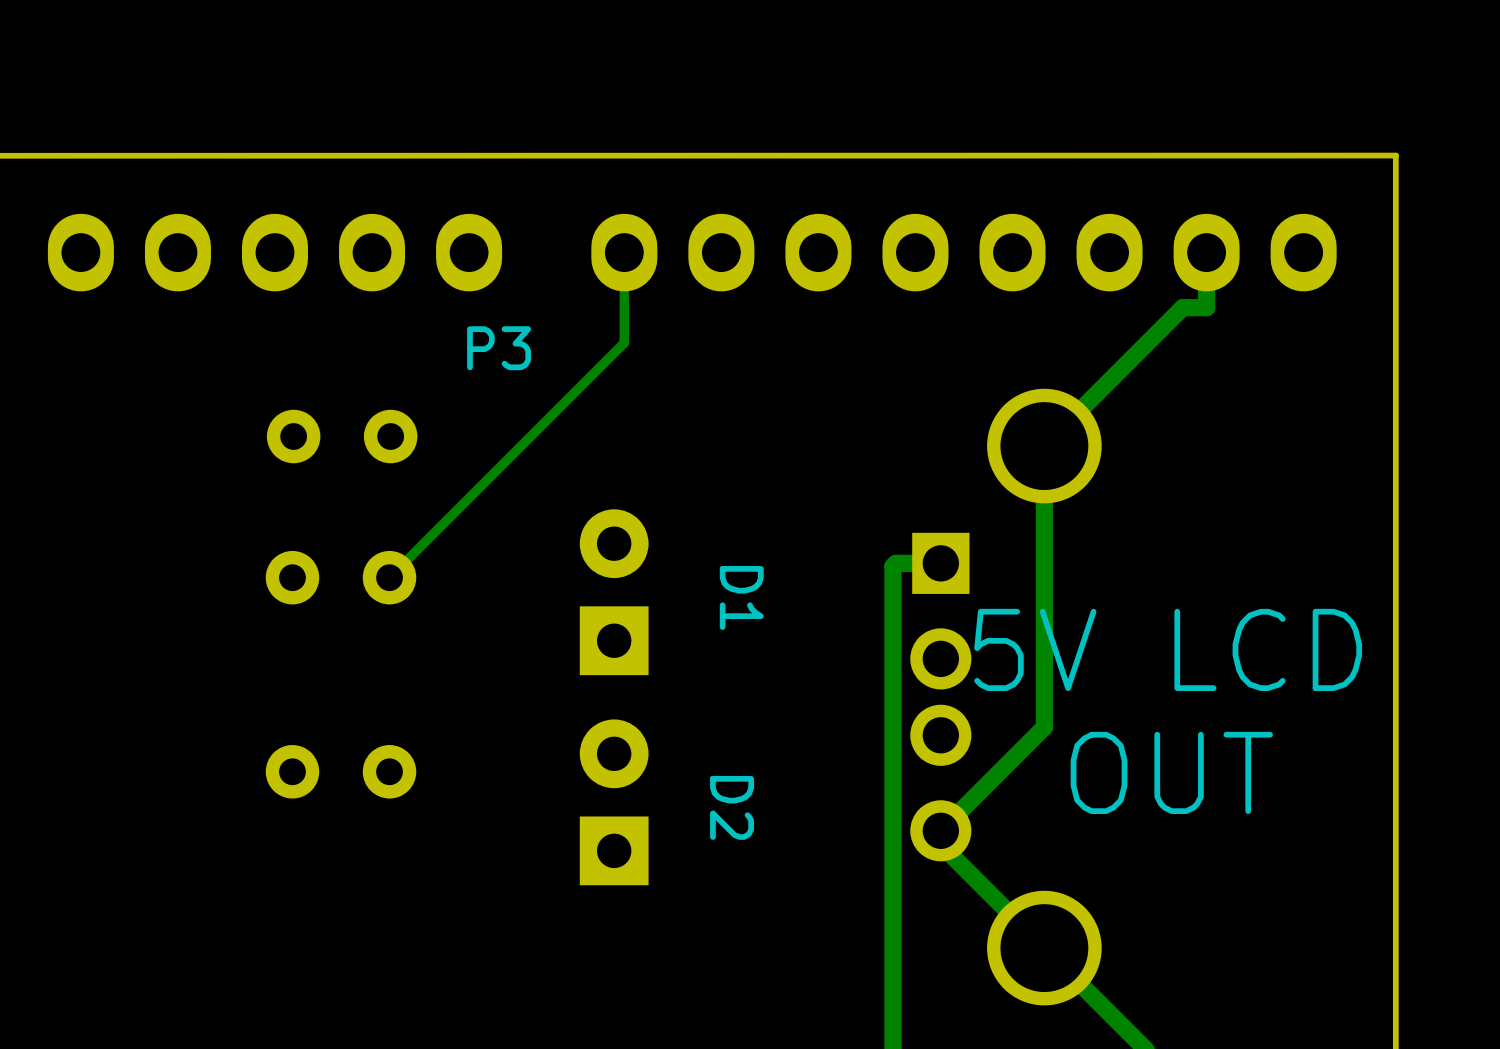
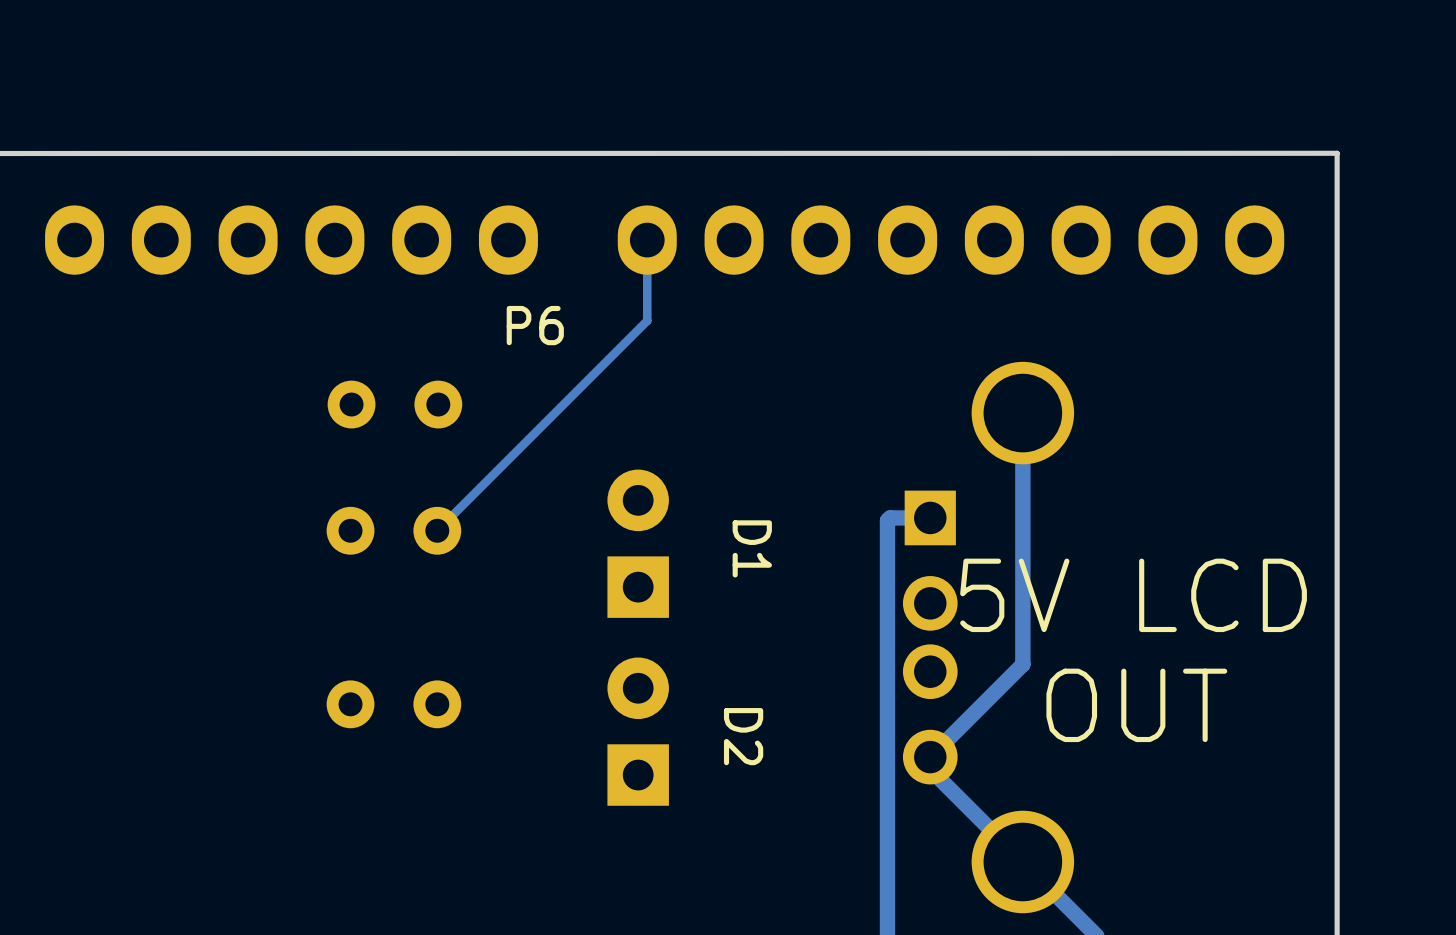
track: (1206, 252) (1206, 307) (1182, 307) (1044, 446) -> none
P3 name: P3 (499, 348) -> P6 (535, 325)

